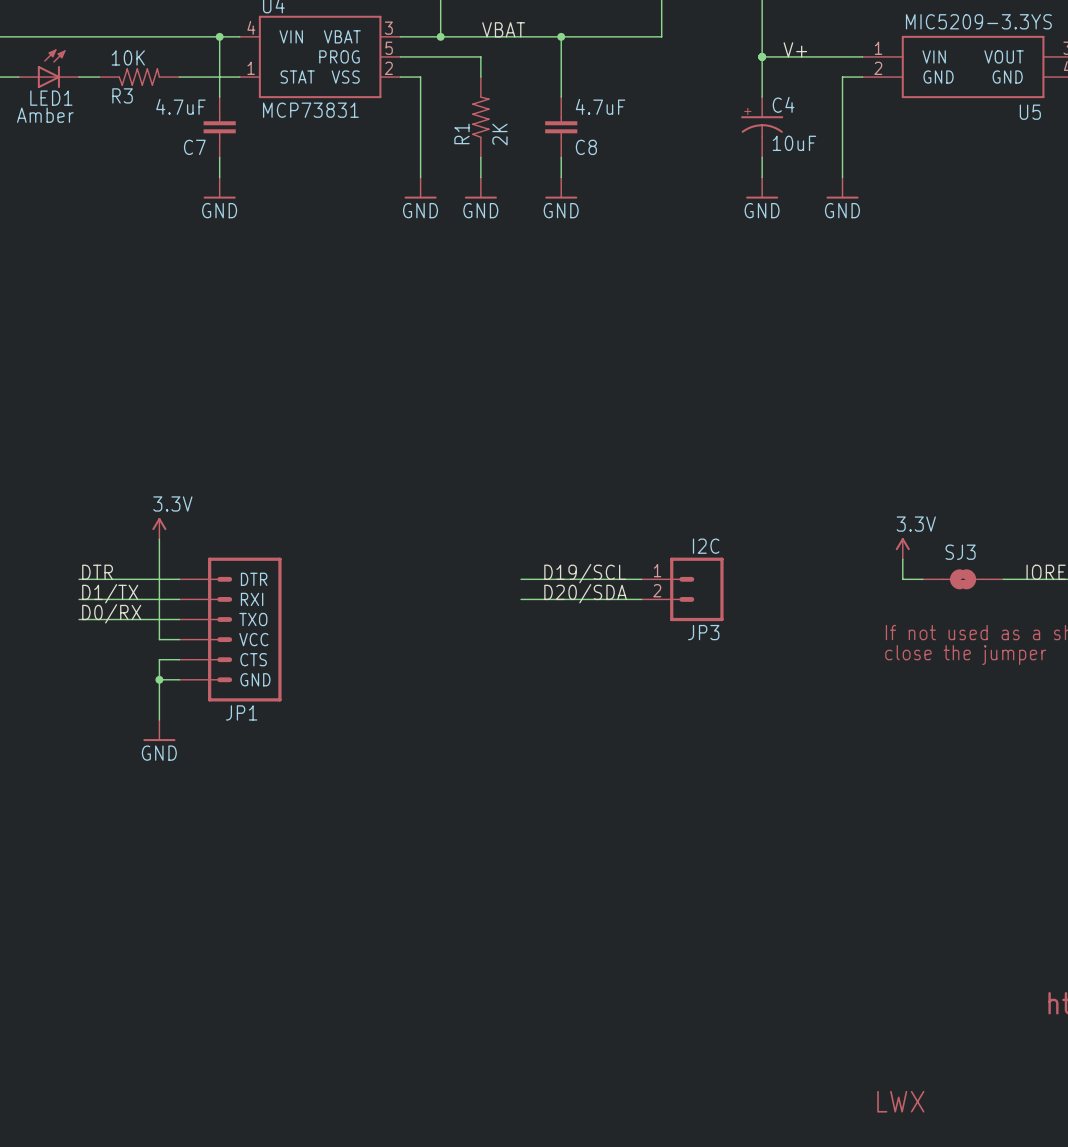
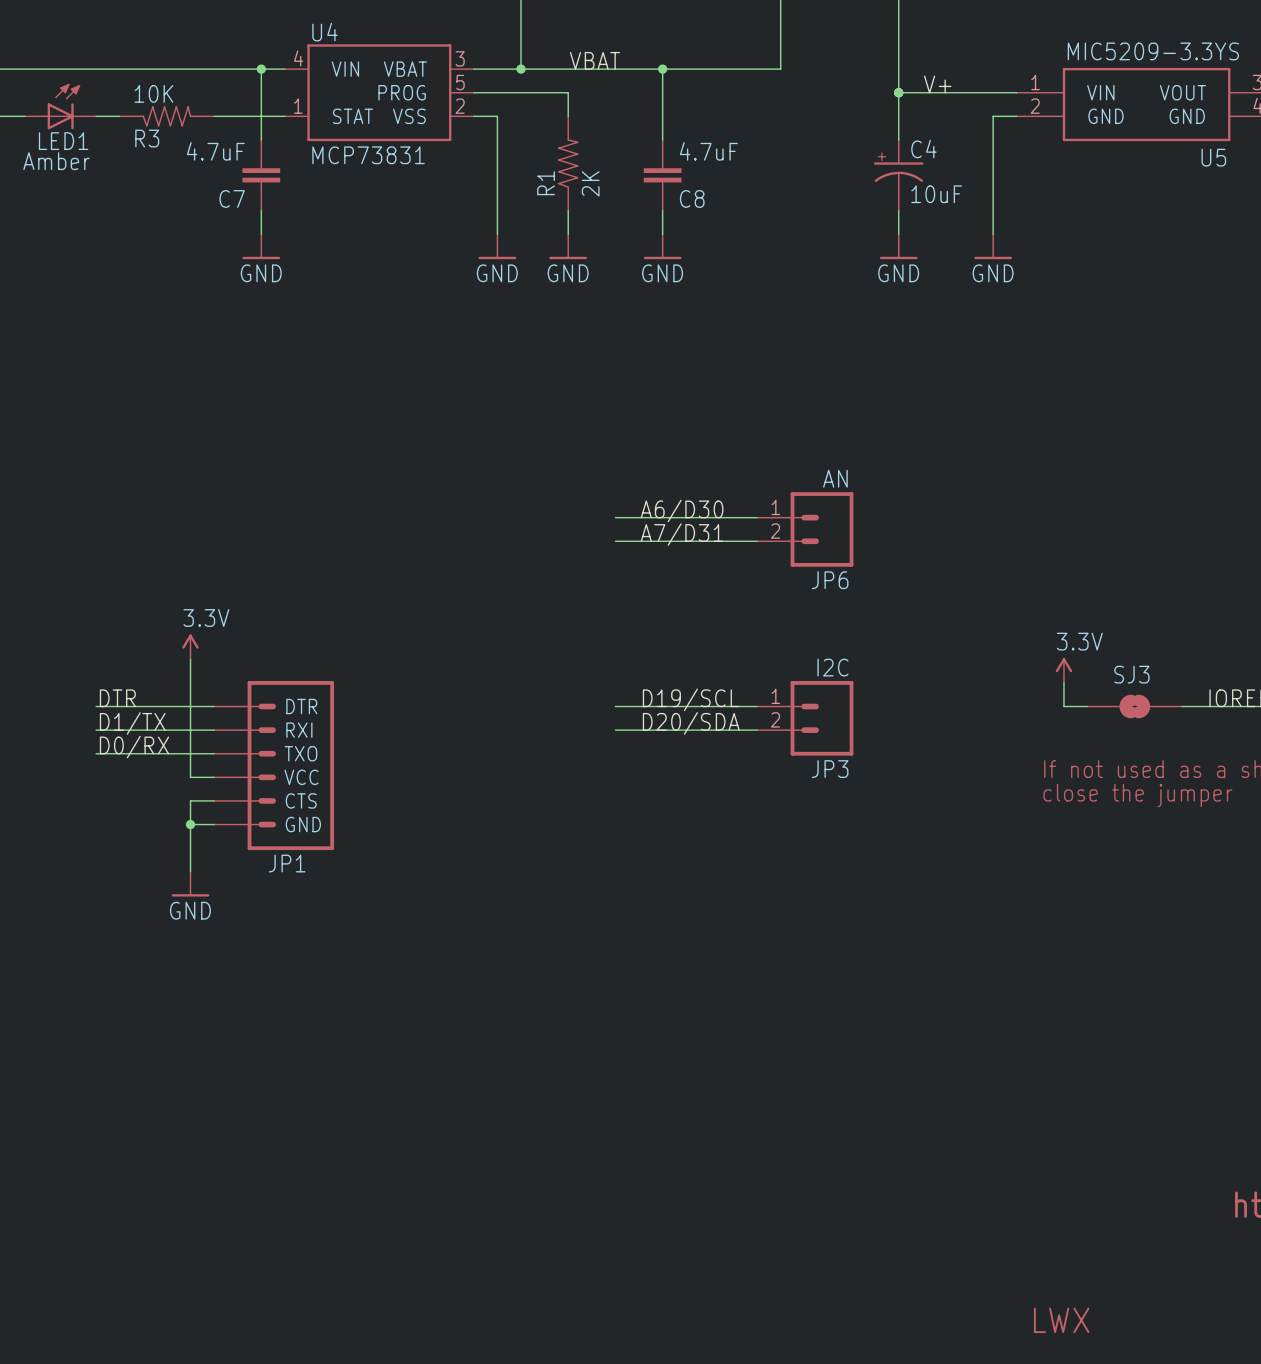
label: none -> A6/D30 (682, 510)
wire: none -> (615, 517) (757, 517)
JP6: none -> AN (805, 529)
label: none -> A7/D31 (682, 534)
wire: none -> (615, 541) (757, 541)

